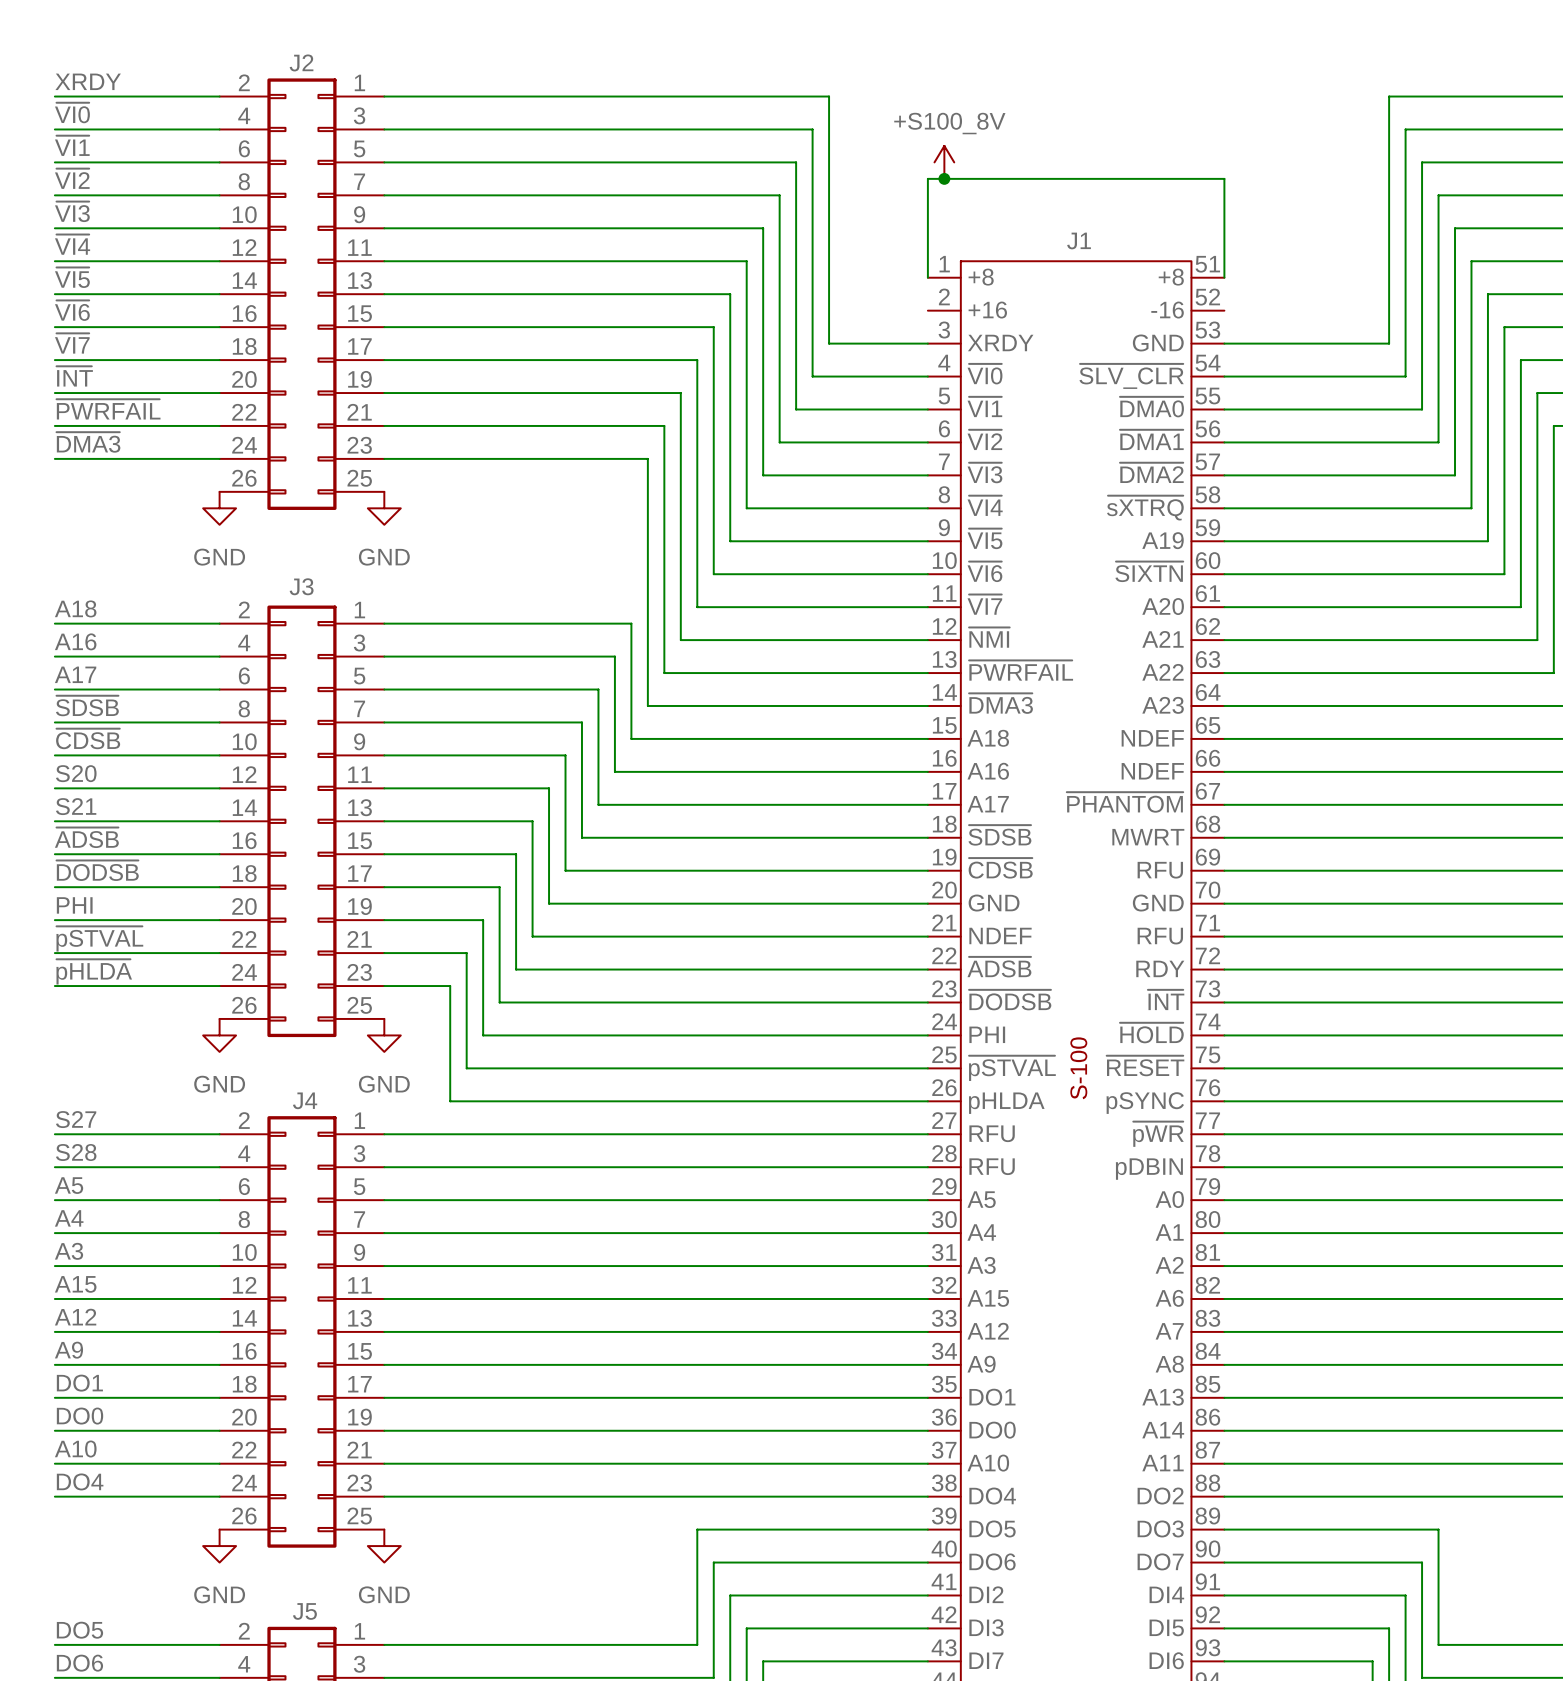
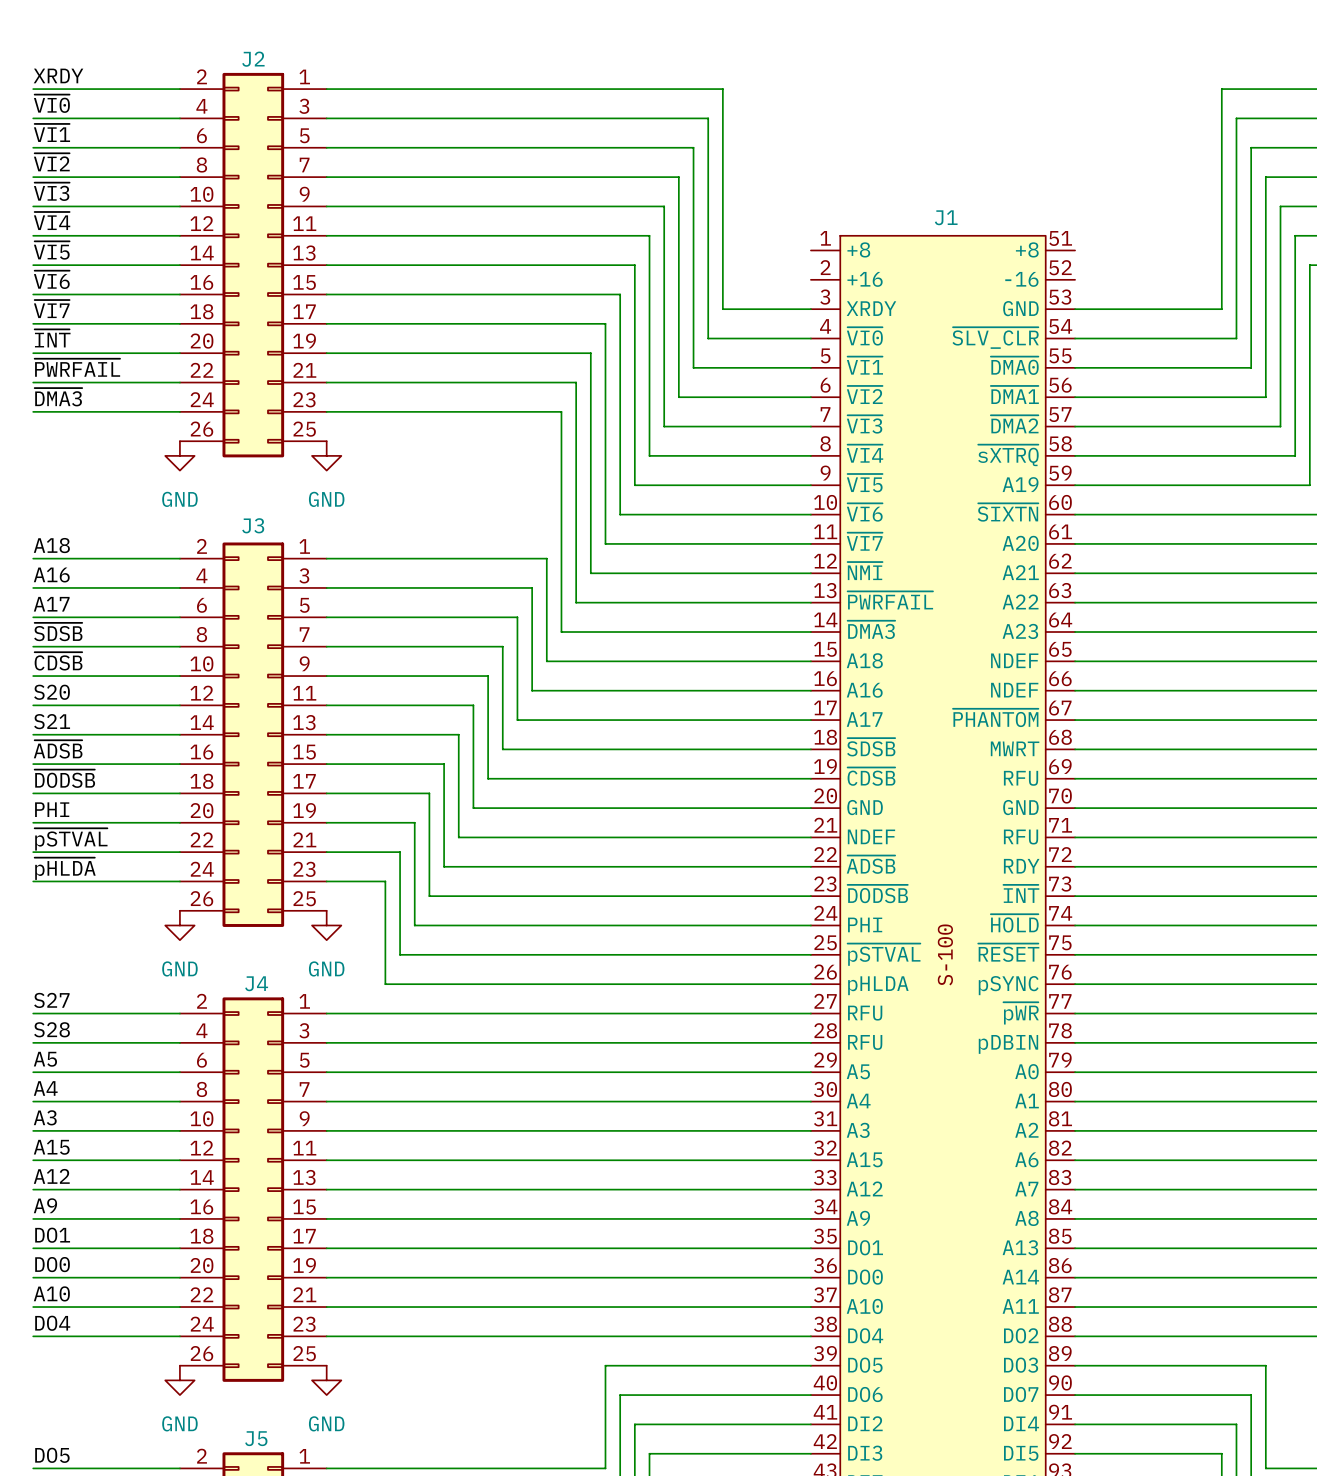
power symbol: +S100_8V (944, 162) -> none
junction: (944, 178) -> none
wire: (927, 277) (927, 178) (1224, 178) (1224, 277) -> none

